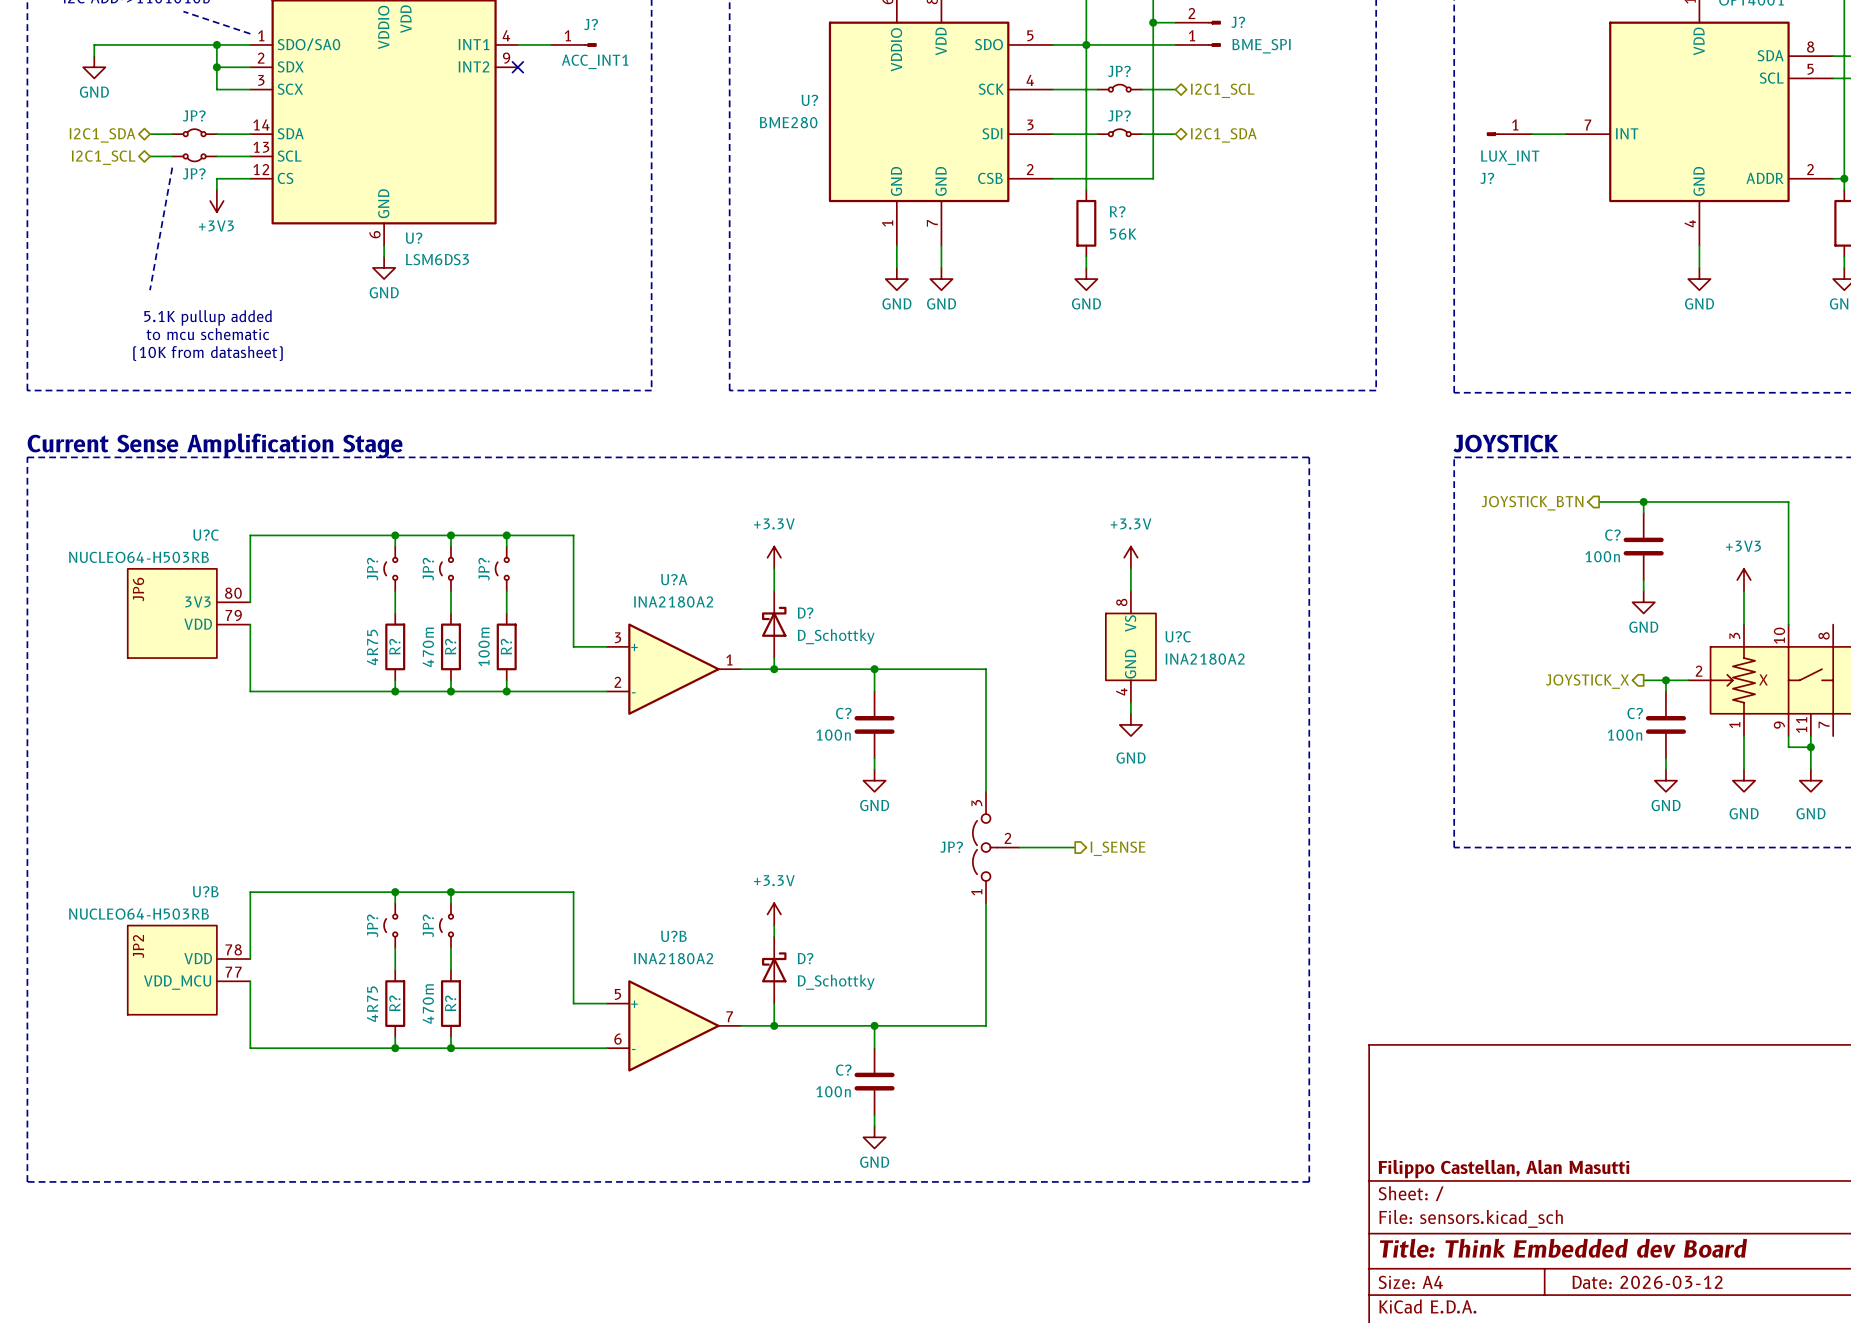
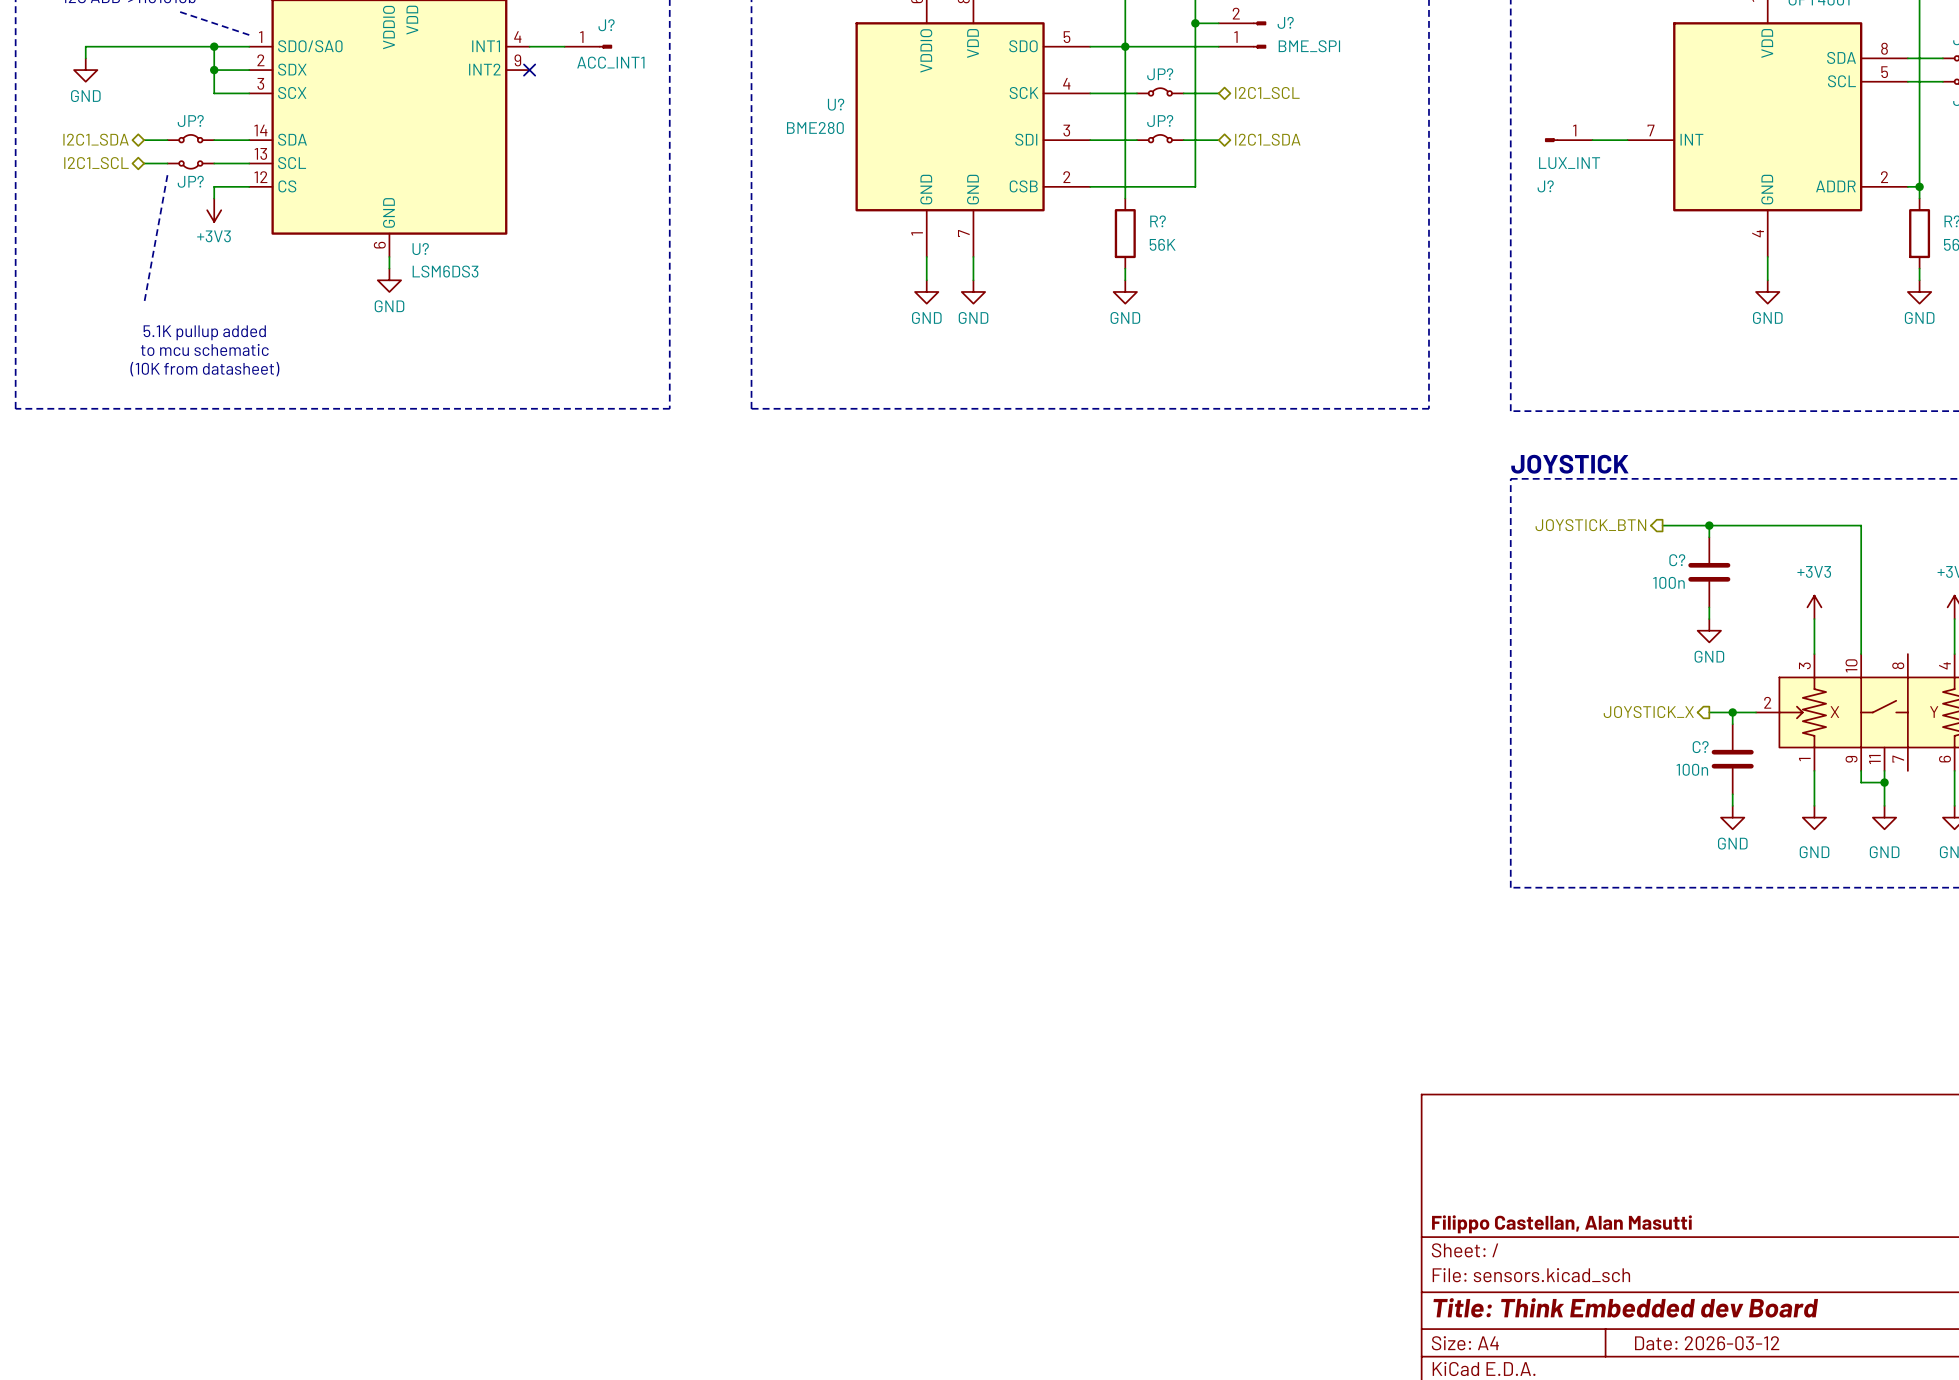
text: Current Sense Amplification Stage (215, 445) -> none
line: (27, 457) (1309, 457) (1309, 1181) (27, 1181) (27, 457) -> none
wire: (395, 535) (395, 546) -> none
junction: (395, 535) -> none
wire: (450, 535) (450, 546) -> none
junction: (450, 535) -> none
wire: (506, 535) (506, 546) -> none
junction: (506, 535) -> none
power symbol: +3.3V (774, 557) -> none
power symbol: +3.3V (1130, 557) -> none
JP?: (390, 568) -> none
JP?: (446, 568) -> none
JP?: (502, 568) -> none
wire: (774, 568) (774, 591) -> none
wire: (1130, 568) (1130, 591) -> none
wire: (395, 591) (395, 613) -> none
wire: (450, 591) (450, 613) -> none
wire: (506, 591) (506, 613) -> none
wire: (250, 602) (250, 535) (573, 535) (573, 646) (607, 646) -> none
U?C: NUCLEO64-H503RB (189, 613) -> none
wire: (250, 624) (250, 691) (607, 691) -> none
D?: D_Schottky (774, 624) -> none
R?: 4R75 (395, 646) -> none
R?: 470m (450, 646) -> none
R?: 100m (506, 646) -> none
U?C: INA2180A2 (1130, 646) -> none
wire: (774, 658) (774, 669) -> none
U?A: INA2180A2 (673, 669) -> none
wire: (740, 669) (986, 669) (986, 791) -> none
junction: (774, 669) -> none
wire: (874, 669) (874, 691) -> none
junction: (874, 669) -> none
wire: (395, 680) (395, 691) -> none
wire: (450, 680) (450, 691) -> none
wire: (506, 680) (506, 691) -> none
junction: (395, 691) -> none
junction: (450, 691) -> none
junction: (506, 691) -> none
wire: (1130, 702) (1130, 713) -> none
C?: 100n (874, 724) -> none
power symbol: GND (1130, 724) -> none
wire: (874, 758) (874, 769) -> none
power symbol: GND (874, 780) -> none
JP?: (996, 847) -> none
wire: (1019, 847) (1075, 847) -> none
hierarchical label: I_SENSE (1117, 848) -> none
wire: (395, 892) (395, 903) -> none
junction: (395, 892) -> none
wire: (450, 892) (450, 903) -> none
junction: (450, 892) -> none
wire: (986, 903) (986, 1025) (740, 1025) -> none
power symbol: +3.3V (774, 914) -> none
JP?: (390, 925) -> none
JP?: (446, 925) -> none
wire: (774, 925) (774, 936) -> none
wire: (395, 947) (395, 970) -> none
wire: (450, 947) (450, 970) -> none
wire: (250, 959) (250, 892) (573, 892) (573, 1003) (607, 1003) -> none
U?B: NUCLEO64-H503RB (189, 970) -> none
D?: D_Schottky (774, 970) -> none
wire: (250, 981) (250, 1048) (607, 1048) -> none
R?: 4R75 (395, 1003) -> none
R?: 470m (450, 1003) -> none
wire: (774, 1003) (774, 1025) -> none
U?B: INA2180A2 (673, 1025) -> none
junction: (774, 1025) -> none
wire: (874, 1025) (874, 1048) -> none
junction: (874, 1025) -> none
wire: (395, 1037) (395, 1048) -> none
wire: (450, 1037) (450, 1048) -> none
junction: (395, 1048) -> none
junction: (450, 1048) -> none
C?: 100n (874, 1081) -> none
wire: (874, 1115) (874, 1126) -> none
power symbol: GND (874, 1137) -> none

